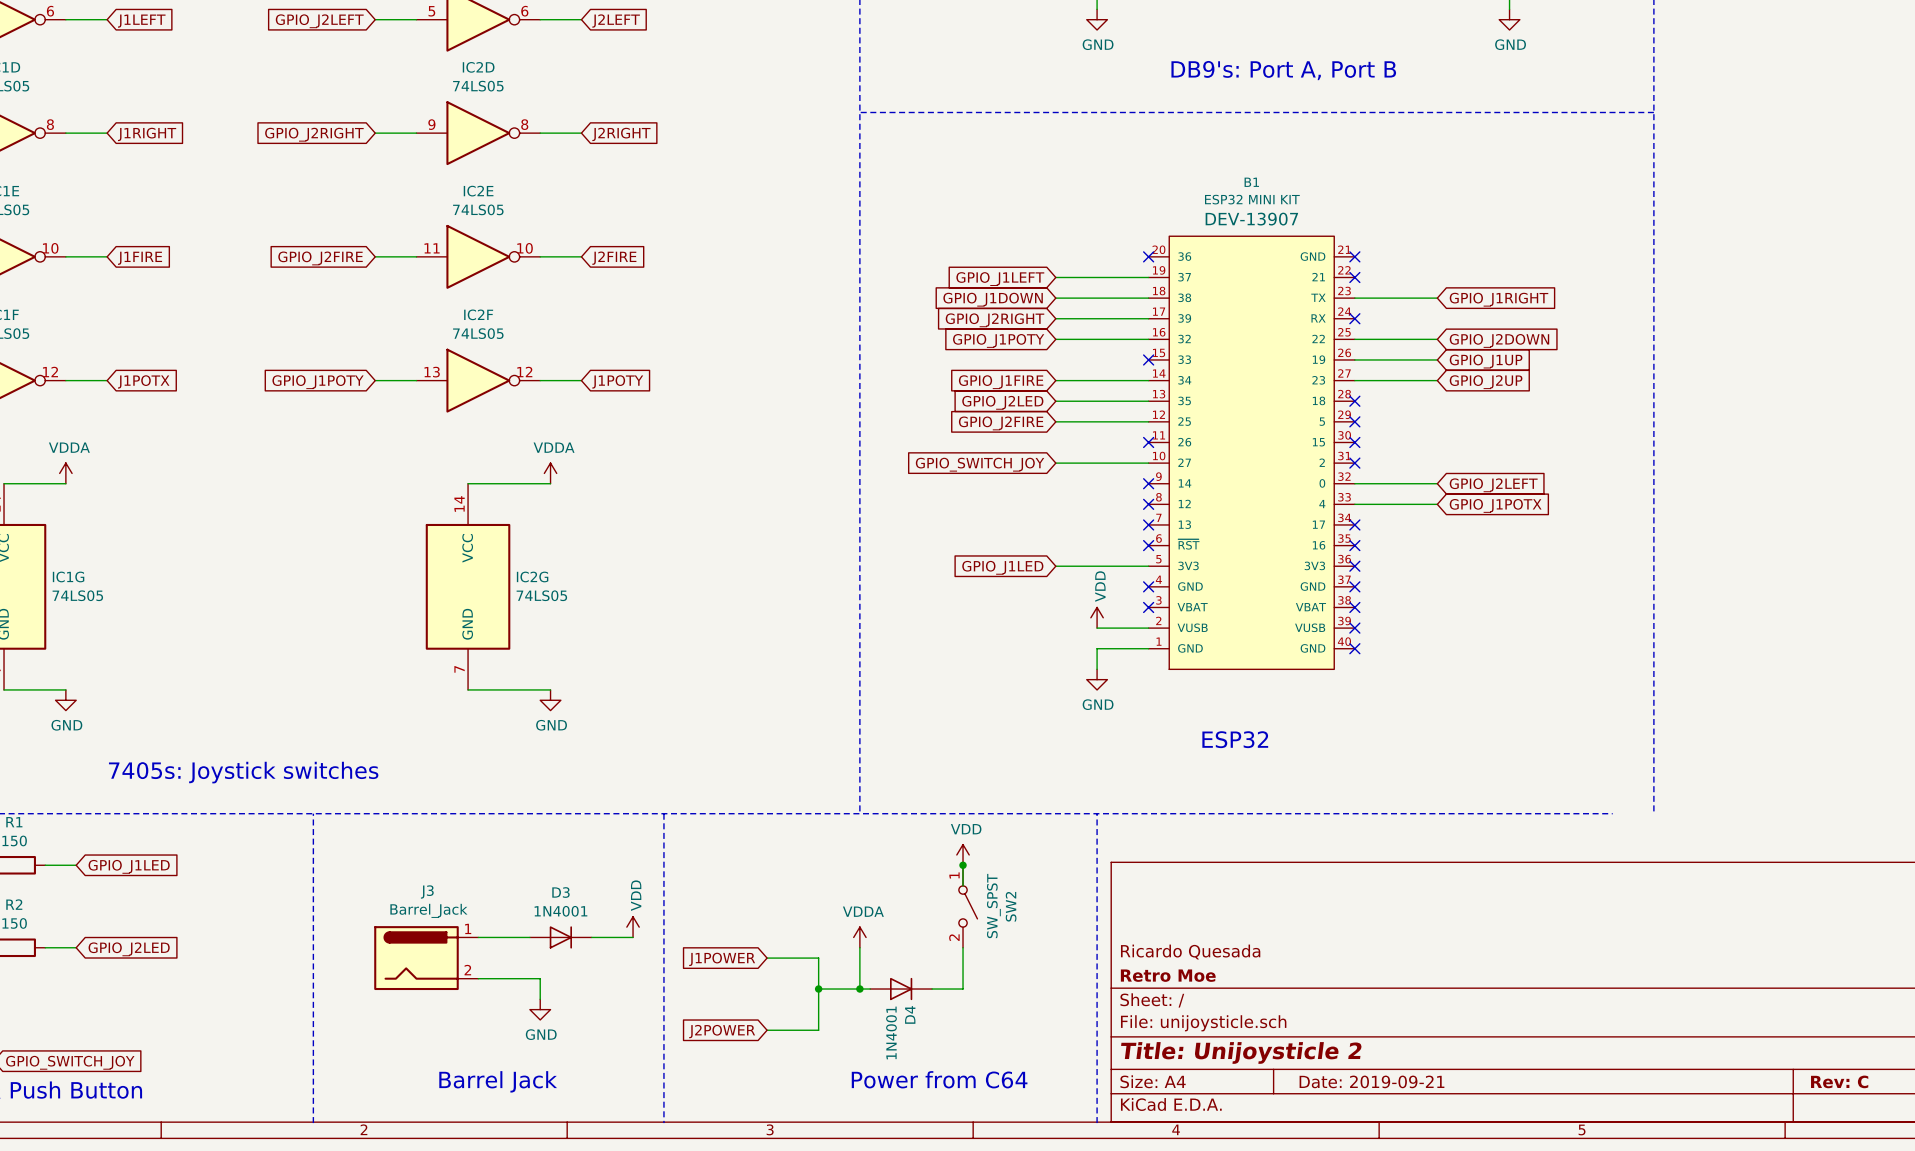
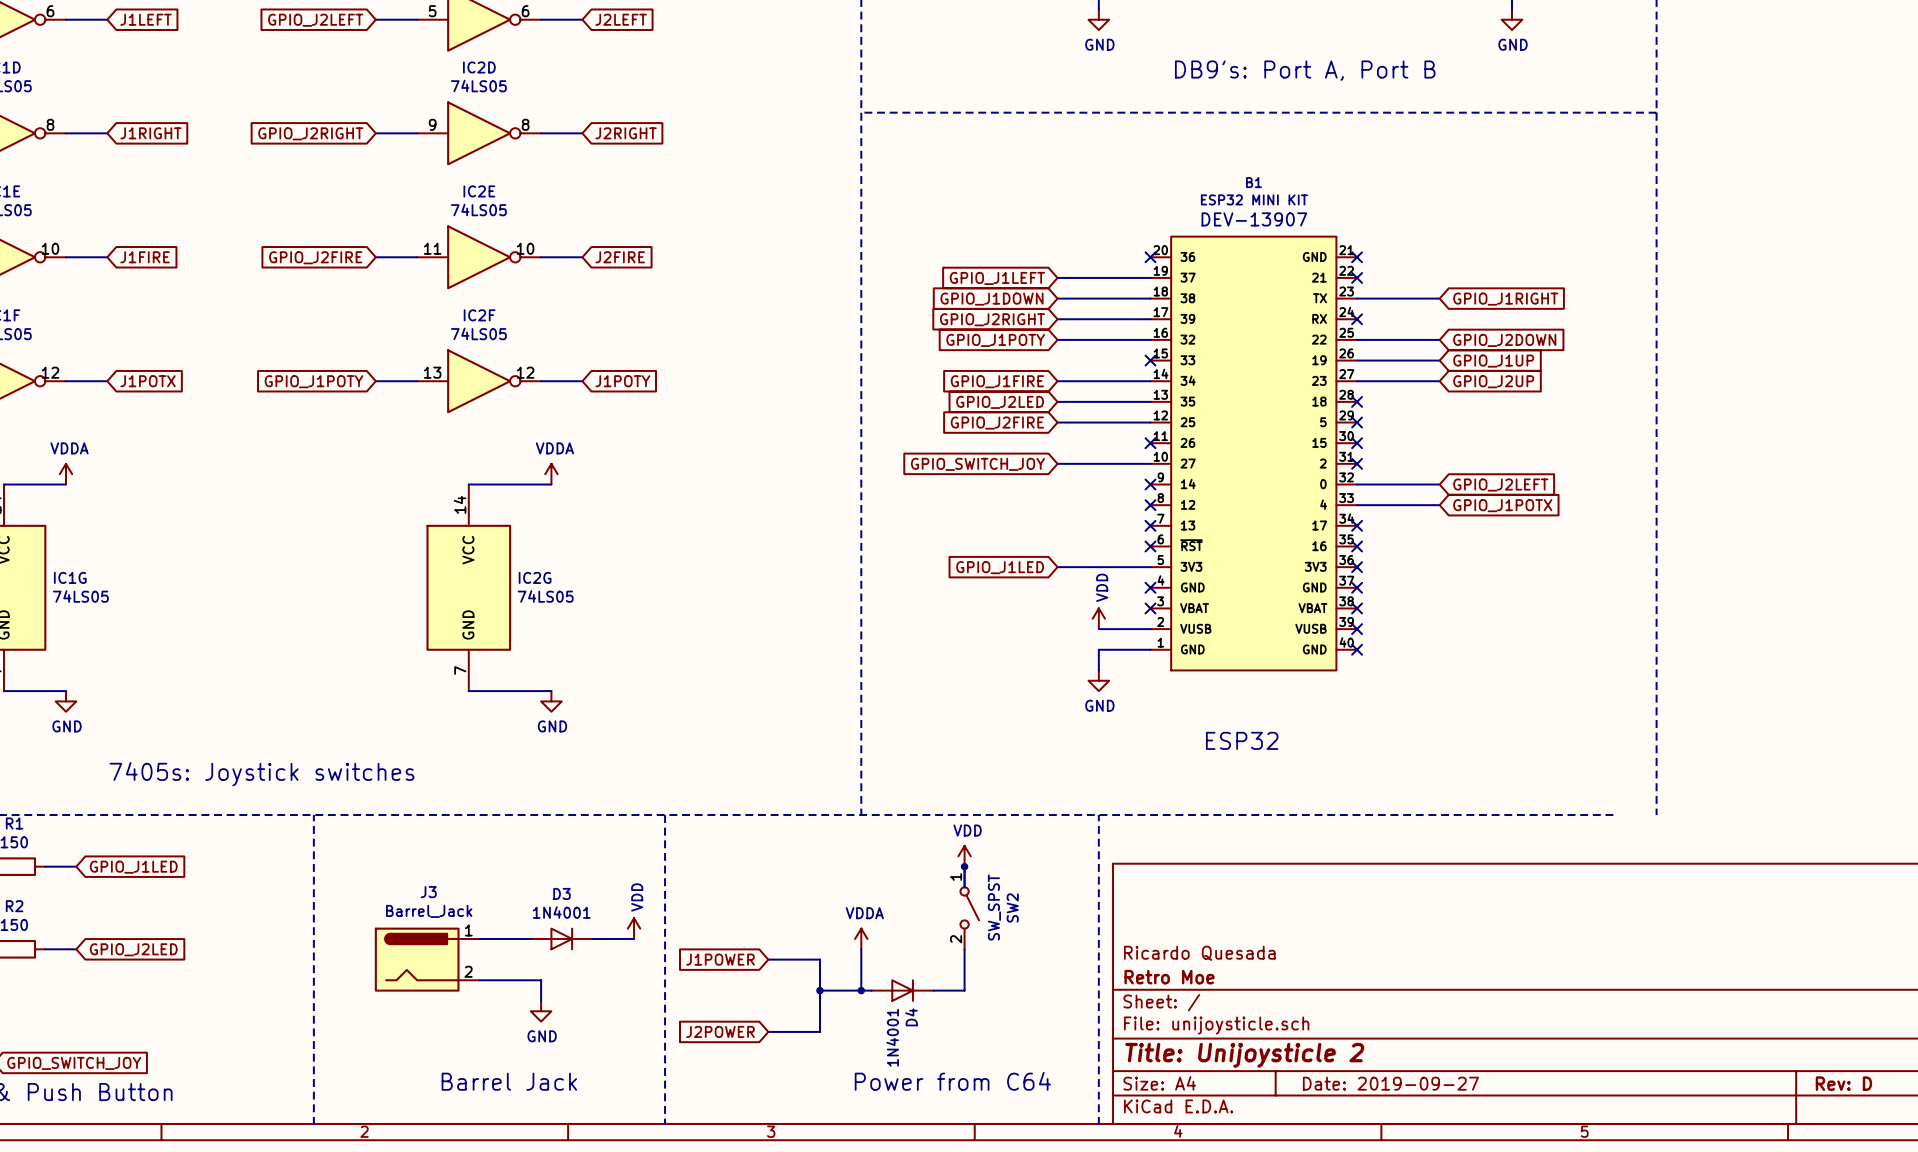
title block: Date: 2019-09-21 (1371, 1081) -> Date: 2019-09-27 (1390, 1083)
title block: Rev: C (1839, 1081) -> Rev: D (1843, 1083)

